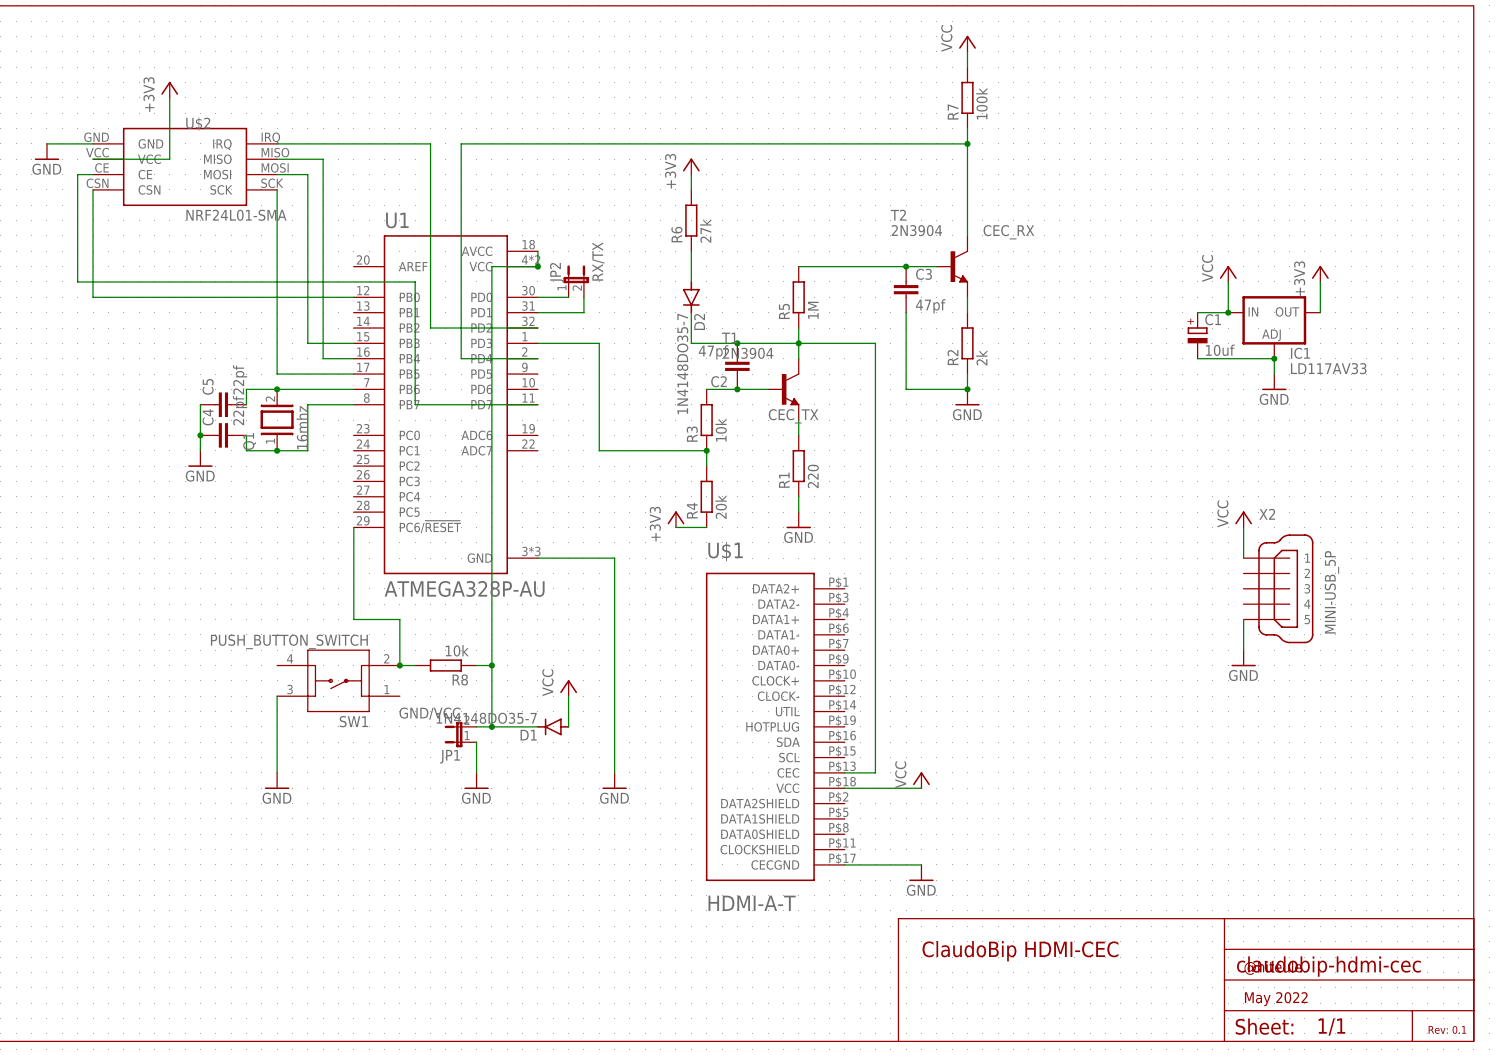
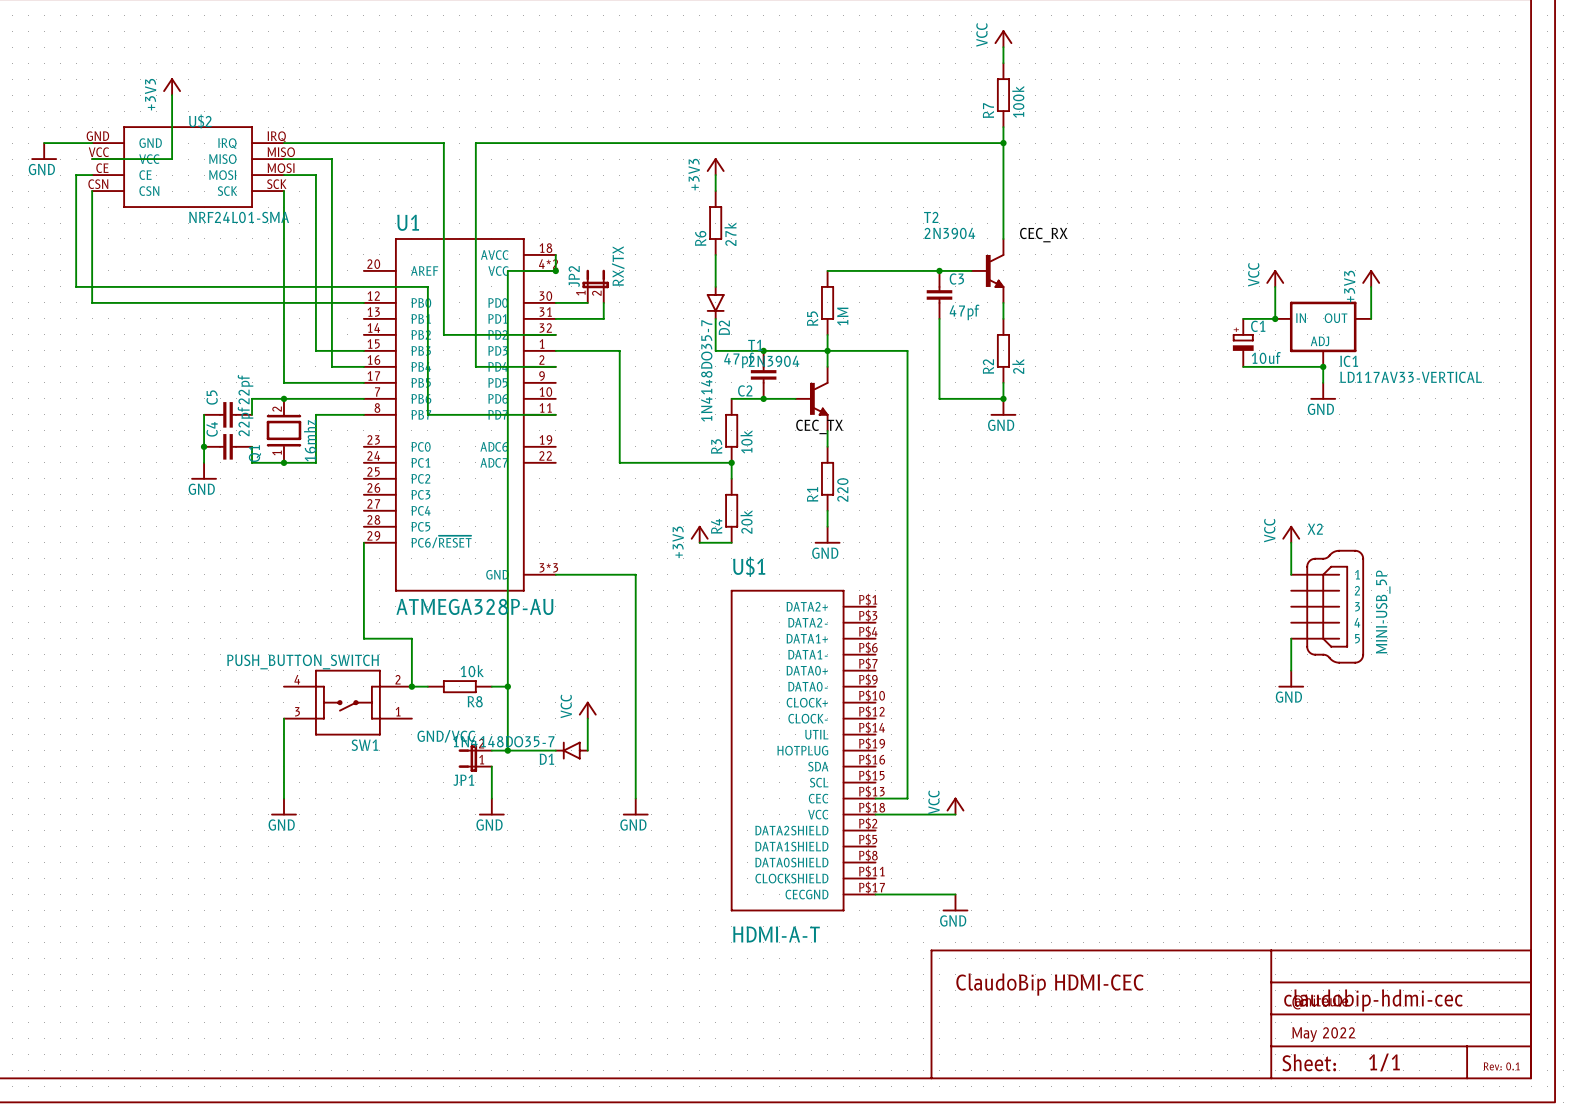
IC1 value: LD117AV33 (1328, 368) -> LD117AV33-VERTICAL (1411, 377)

